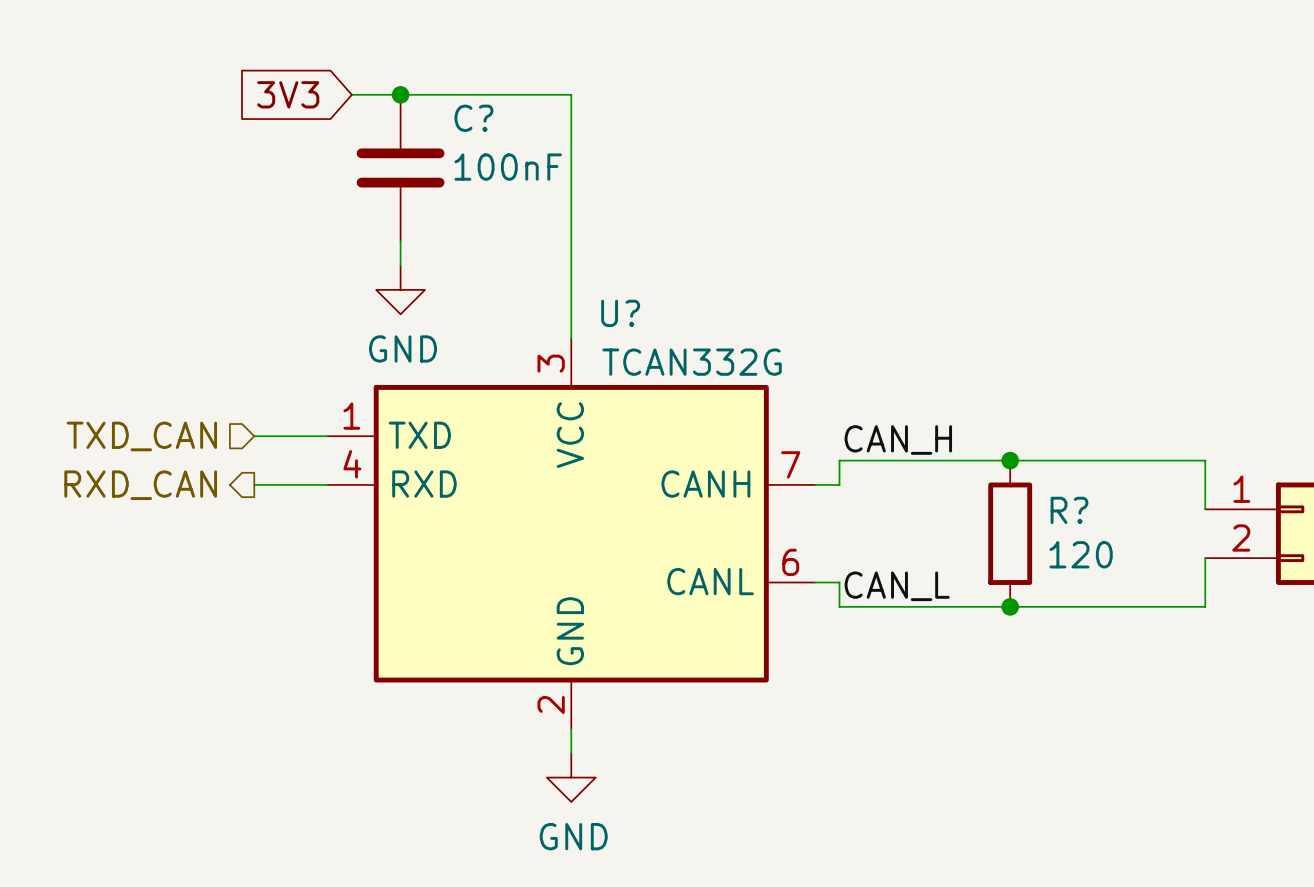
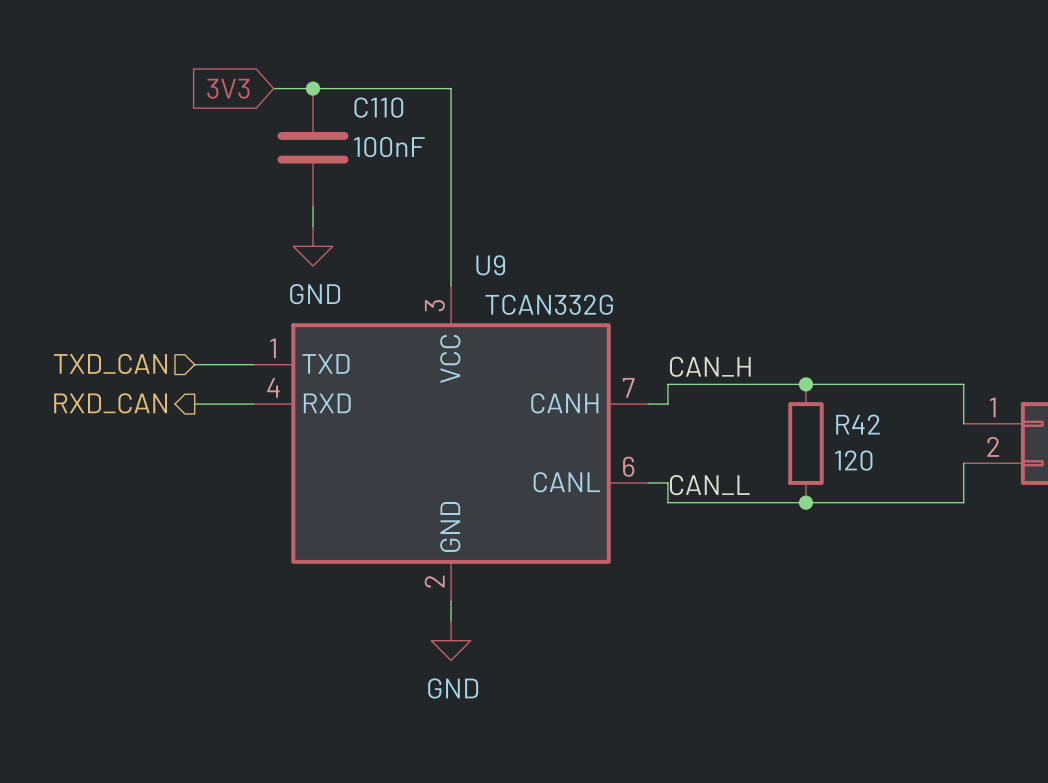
C? name: C? (473, 118) -> C110 (378, 107)
U? name: U? (620, 313) -> U9 (490, 265)
R? name: R? (1069, 510) -> R42 (858, 424)

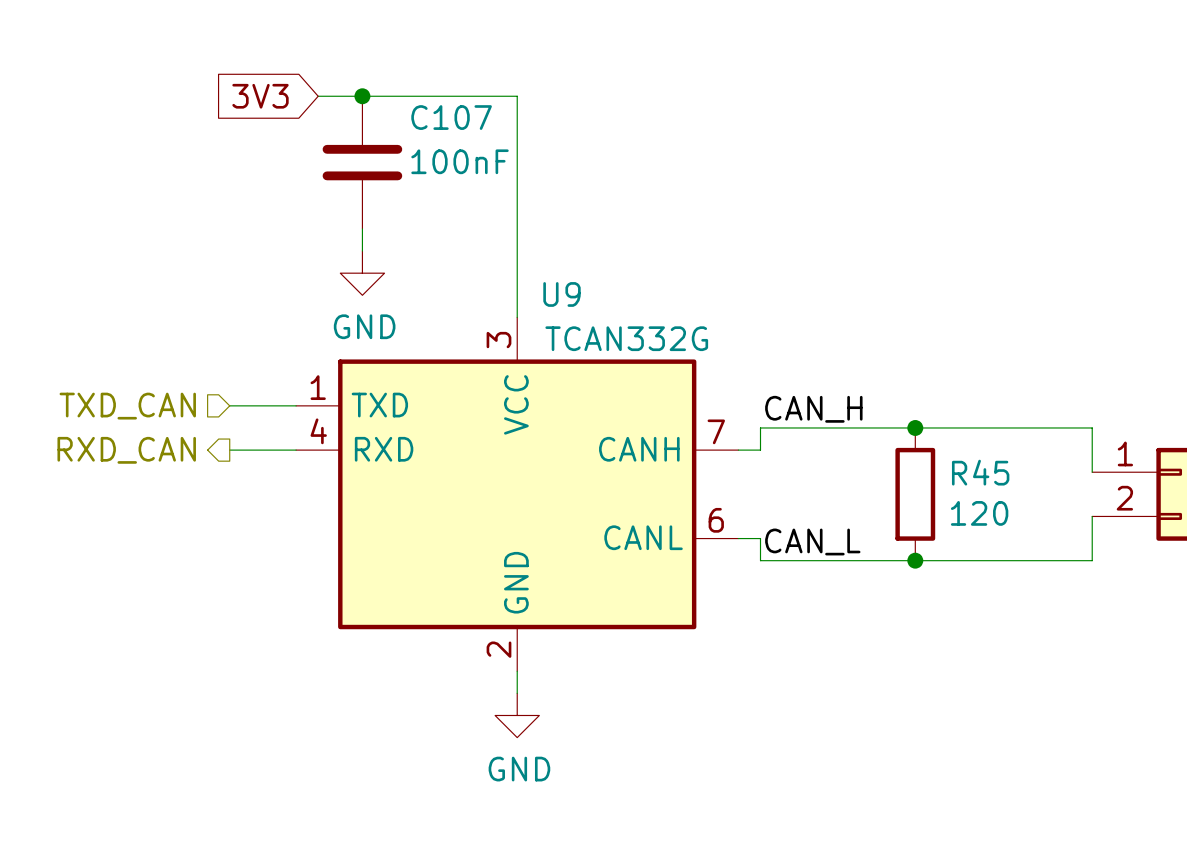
C110 name: C110 (378, 107) -> C107 (451, 117)
R42 name: R42 (858, 424) -> R45 (980, 472)

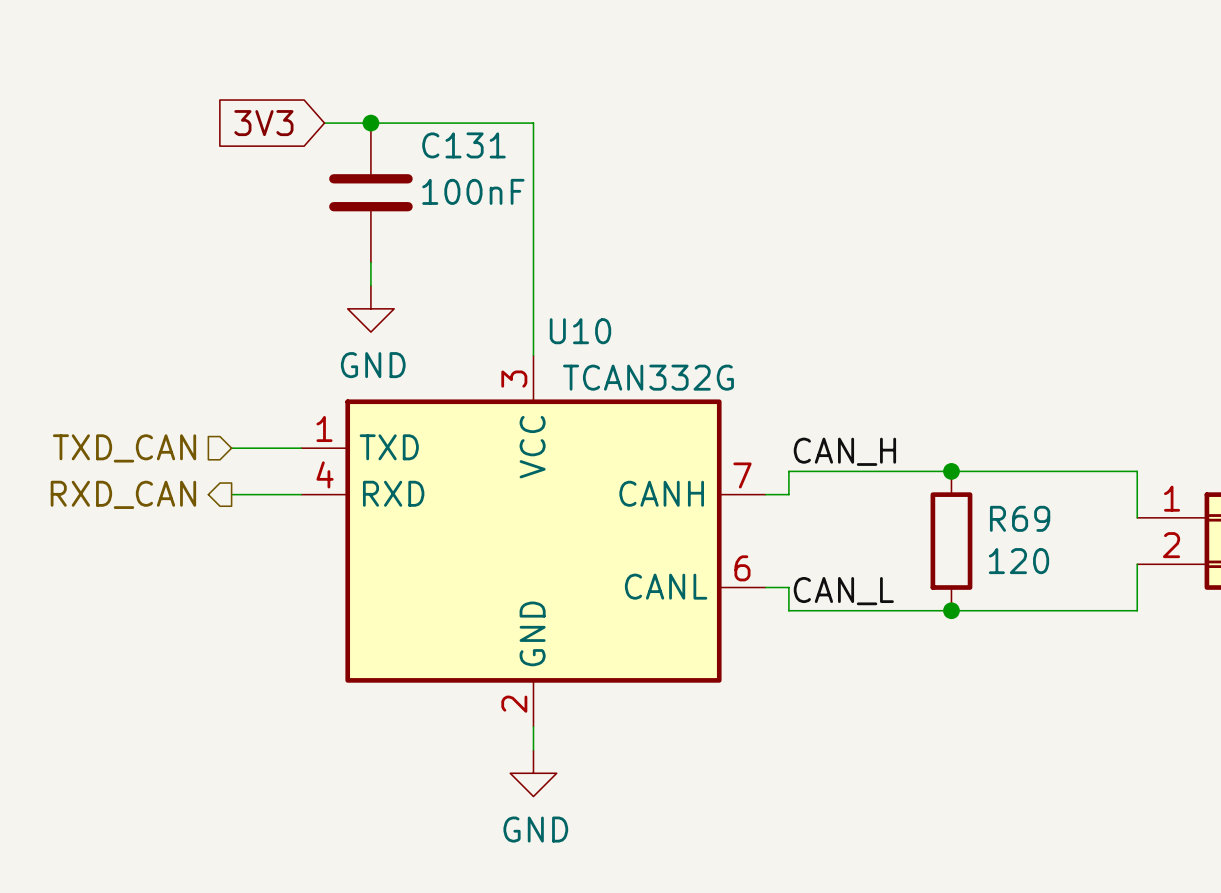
C107 name: C107 (451, 117) -> C131 (463, 145)
U9 name: U9 (561, 294) -> U10 (580, 331)
R45 name: R45 (980, 472) -> R69 (1020, 518)

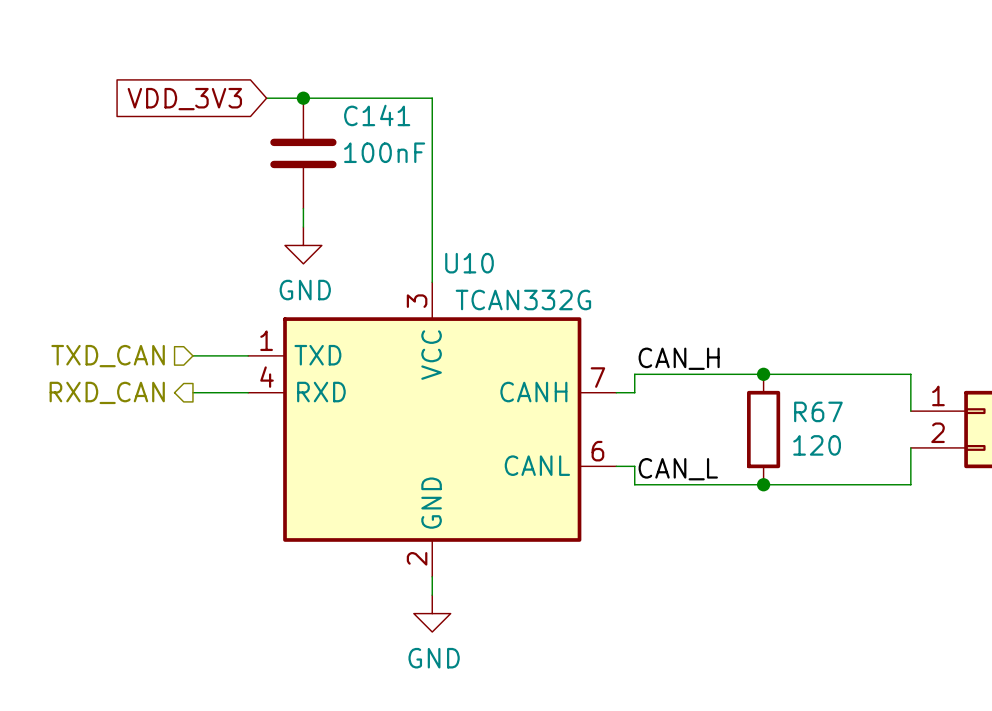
global label: 3V3 (263, 123) -> VDD_3V3 (184, 99)
C131 name: C131 (463, 145) -> C141 (377, 115)
R69 name: R69 (1020, 518) -> R67 (818, 411)

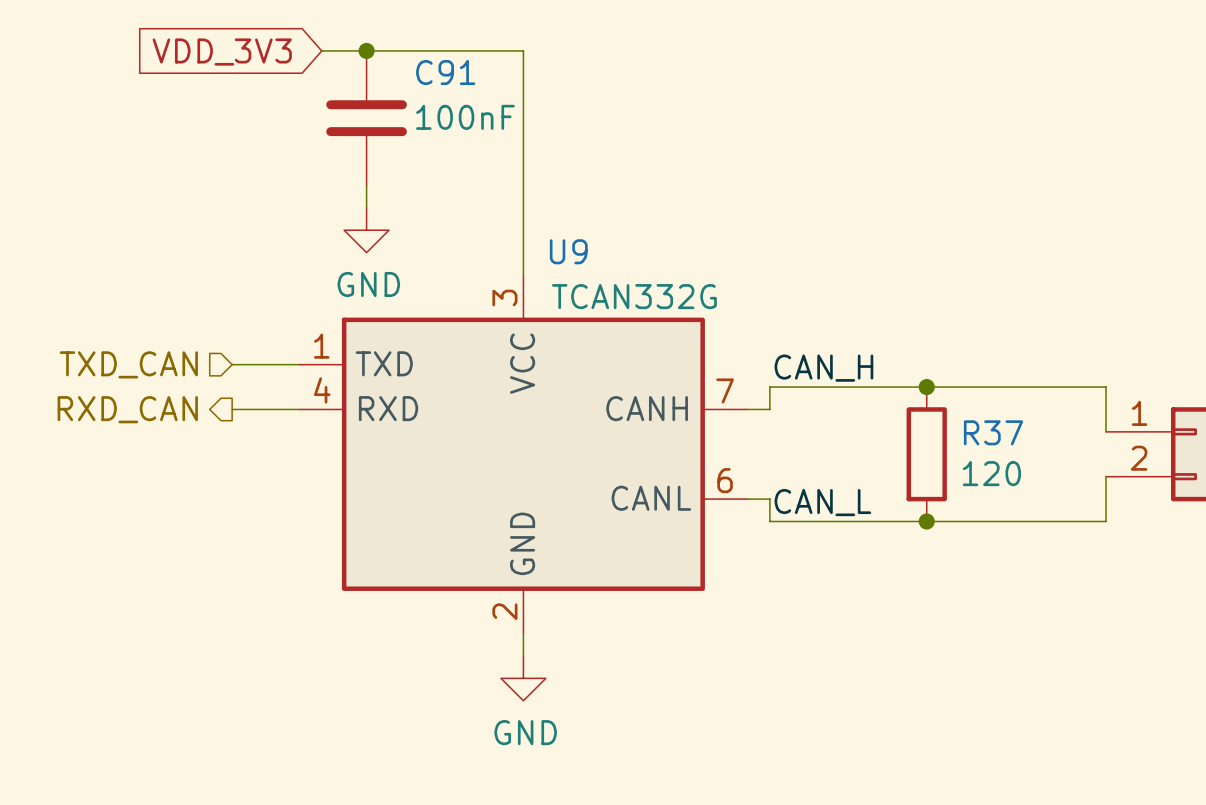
C141 name: C141 (377, 115) -> C91 (445, 72)
U10 name: U10 (469, 263) -> U9 (568, 251)
R67 name: R67 (818, 411) -> R37 (993, 432)

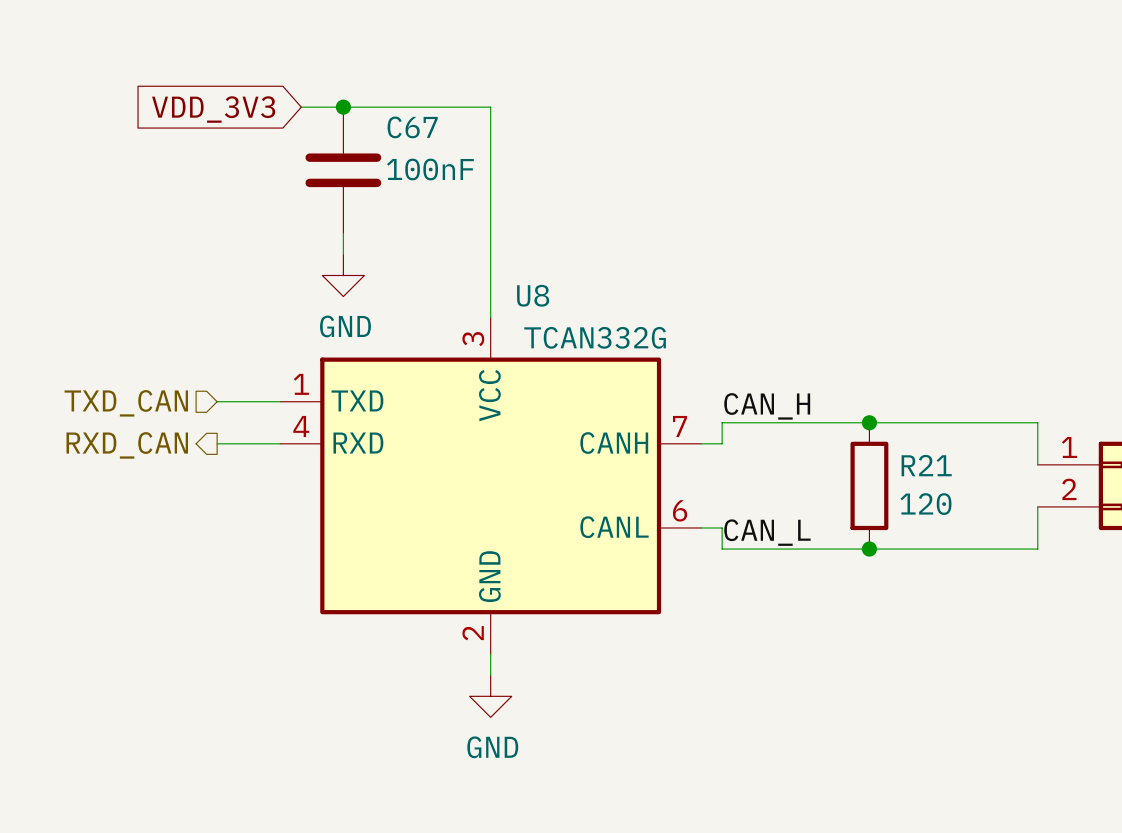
C91 name: C91 (445, 72) -> C67 (412, 127)
U9 name: U9 (568, 251) -> U8 (533, 295)
R37 name: R37 (993, 432) -> R21 (926, 465)

